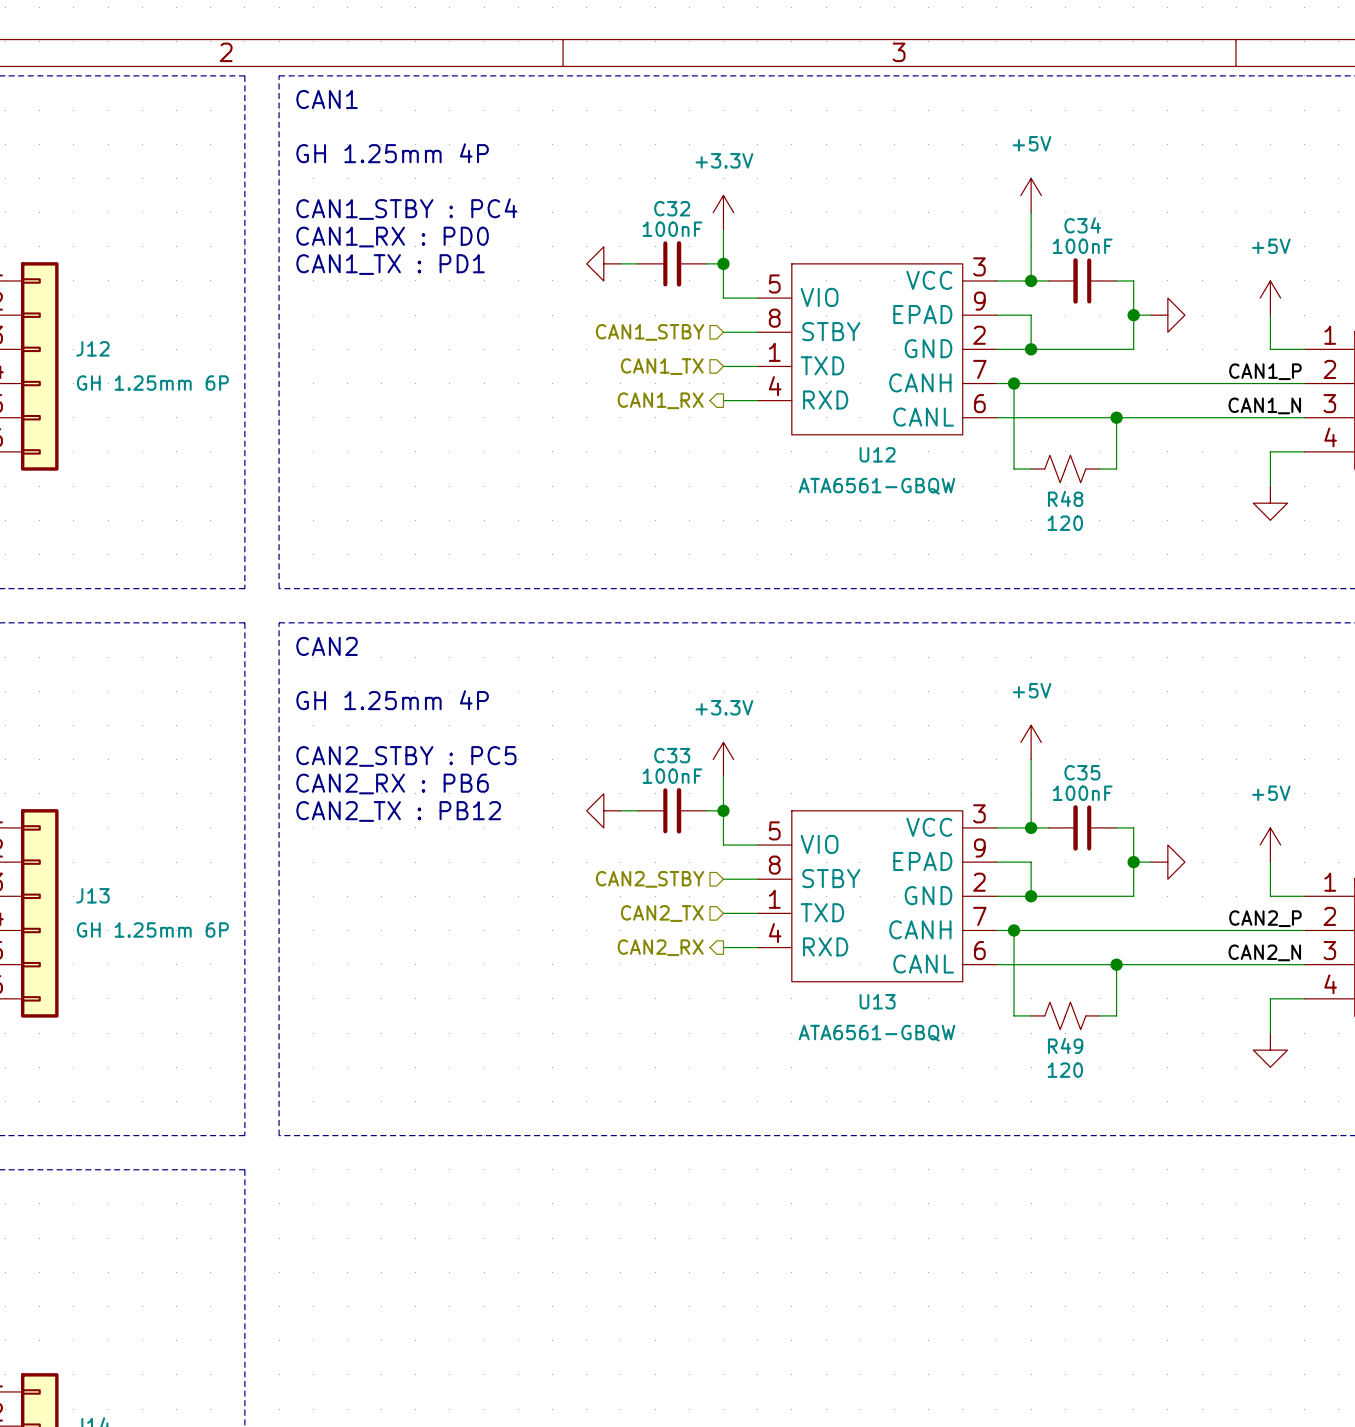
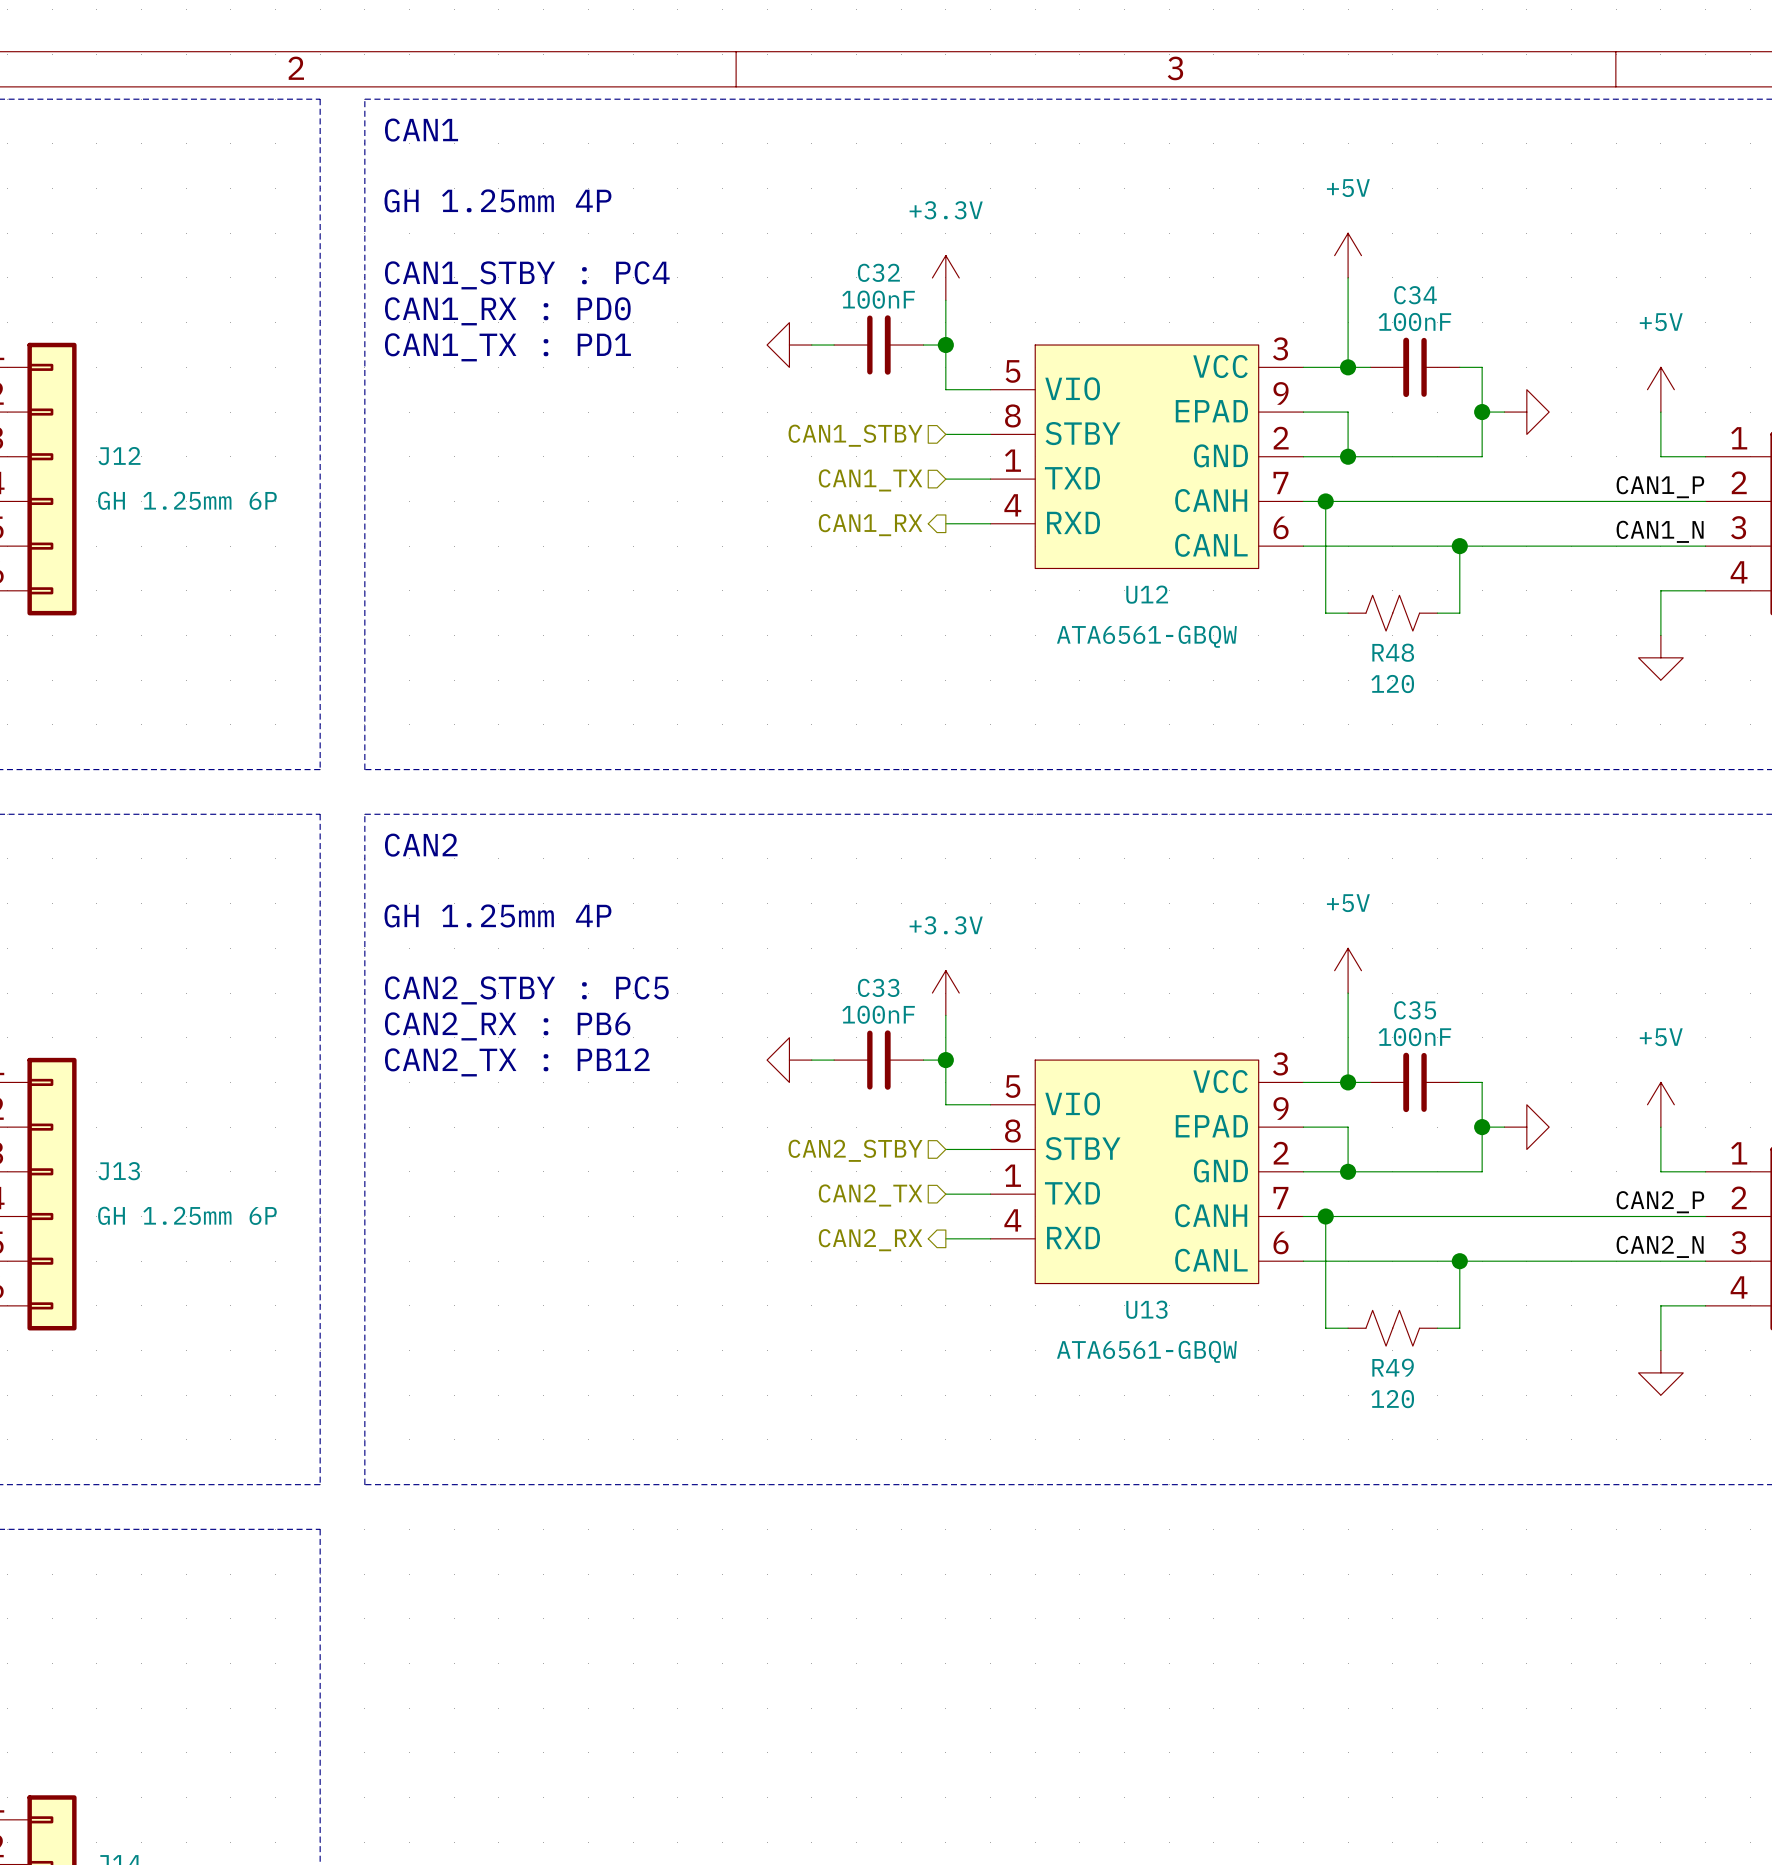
U12 symbol: [757, 263, 997, 435] -> [990, 345, 1304, 569]
U13 symbol: [757, 810, 997, 982] -> [990, 1060, 1304, 1284]

